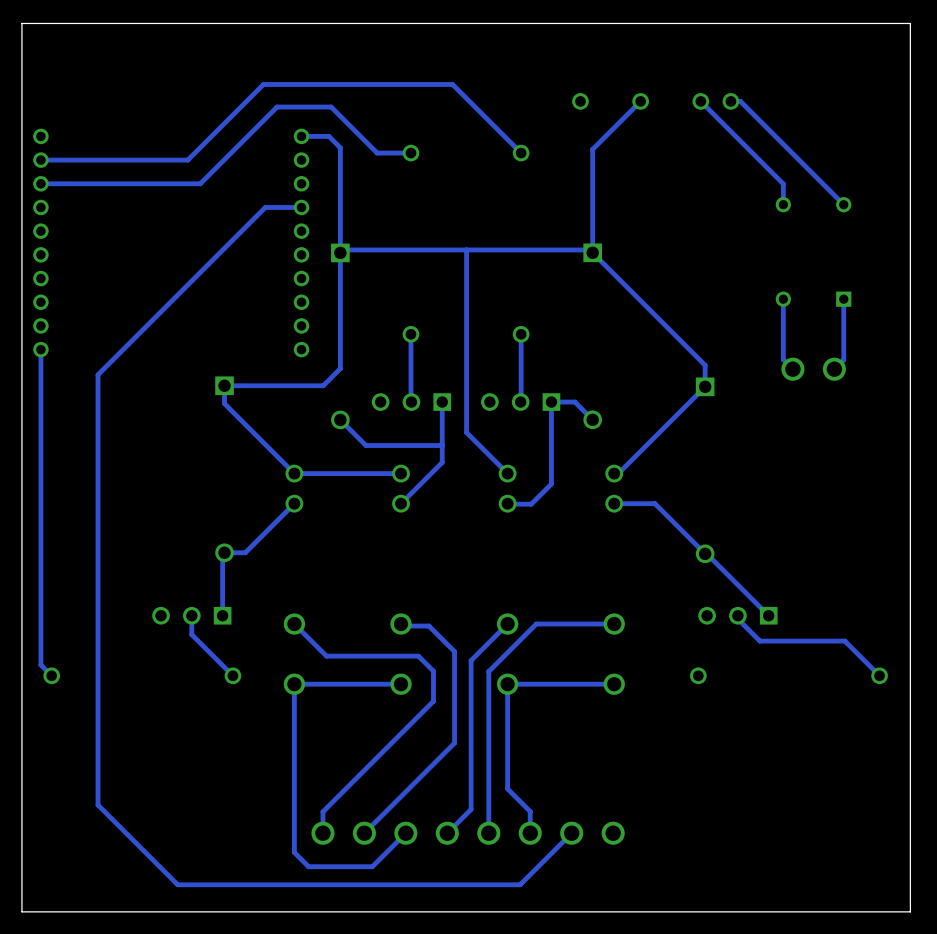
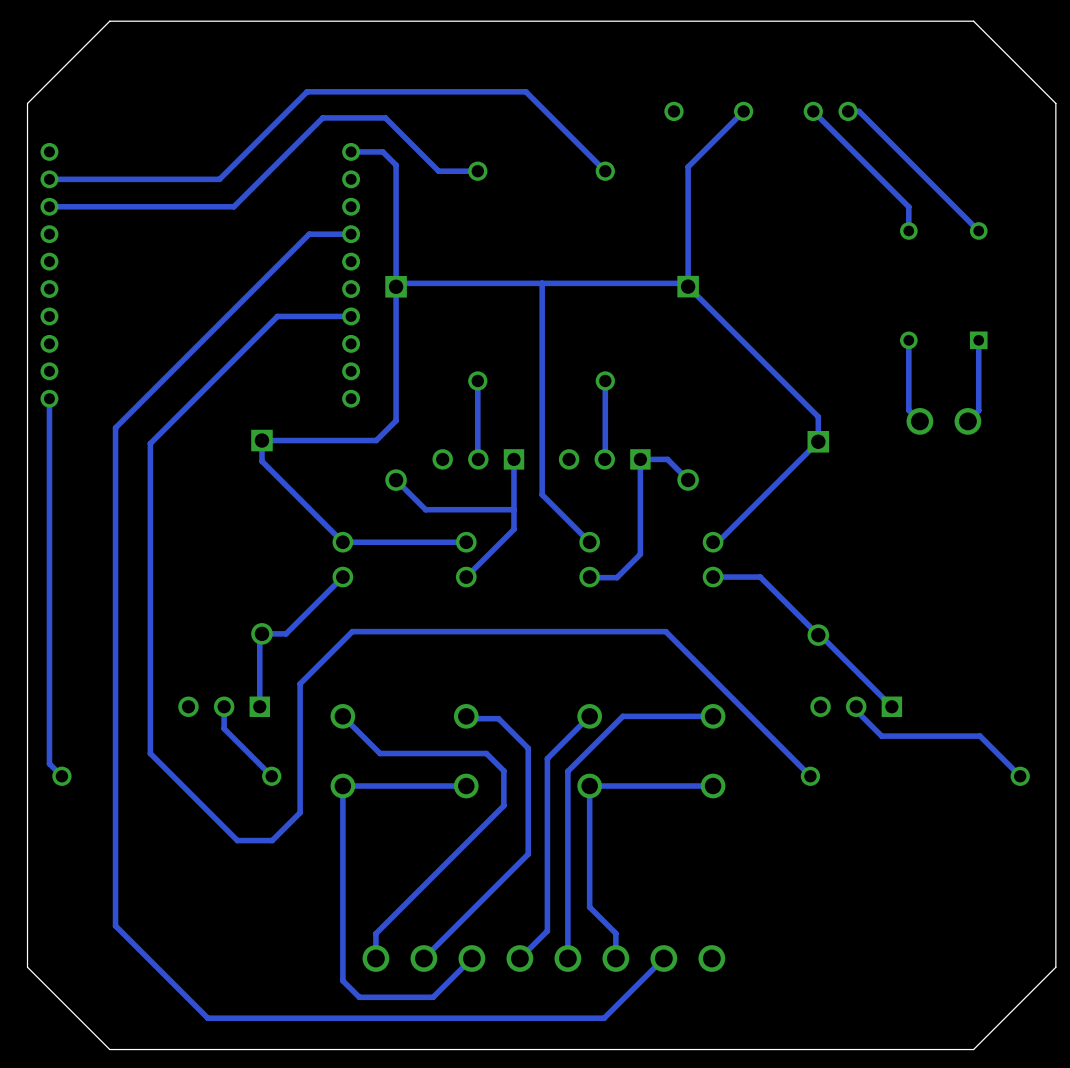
board edge: (93, 23) (21, 23) (21, 94) -> (109, 21) (27, 103)
board edge: (839, 23) (910, 23) (910, 94) -> (973, 21) (1055, 103)
track: none -> (351, 316) (277, 316) (150, 443) (150, 753) (237, 840) (272, 840) (300, 812) (300, 683) (352, 631) (665, 631) (810, 776)
board edge: (21, 840) (21, 911) (93, 911) -> (27, 967) (109, 1049)
board edge: (910, 840) (910, 911) (839, 911) -> (1055, 967) (973, 1049)

